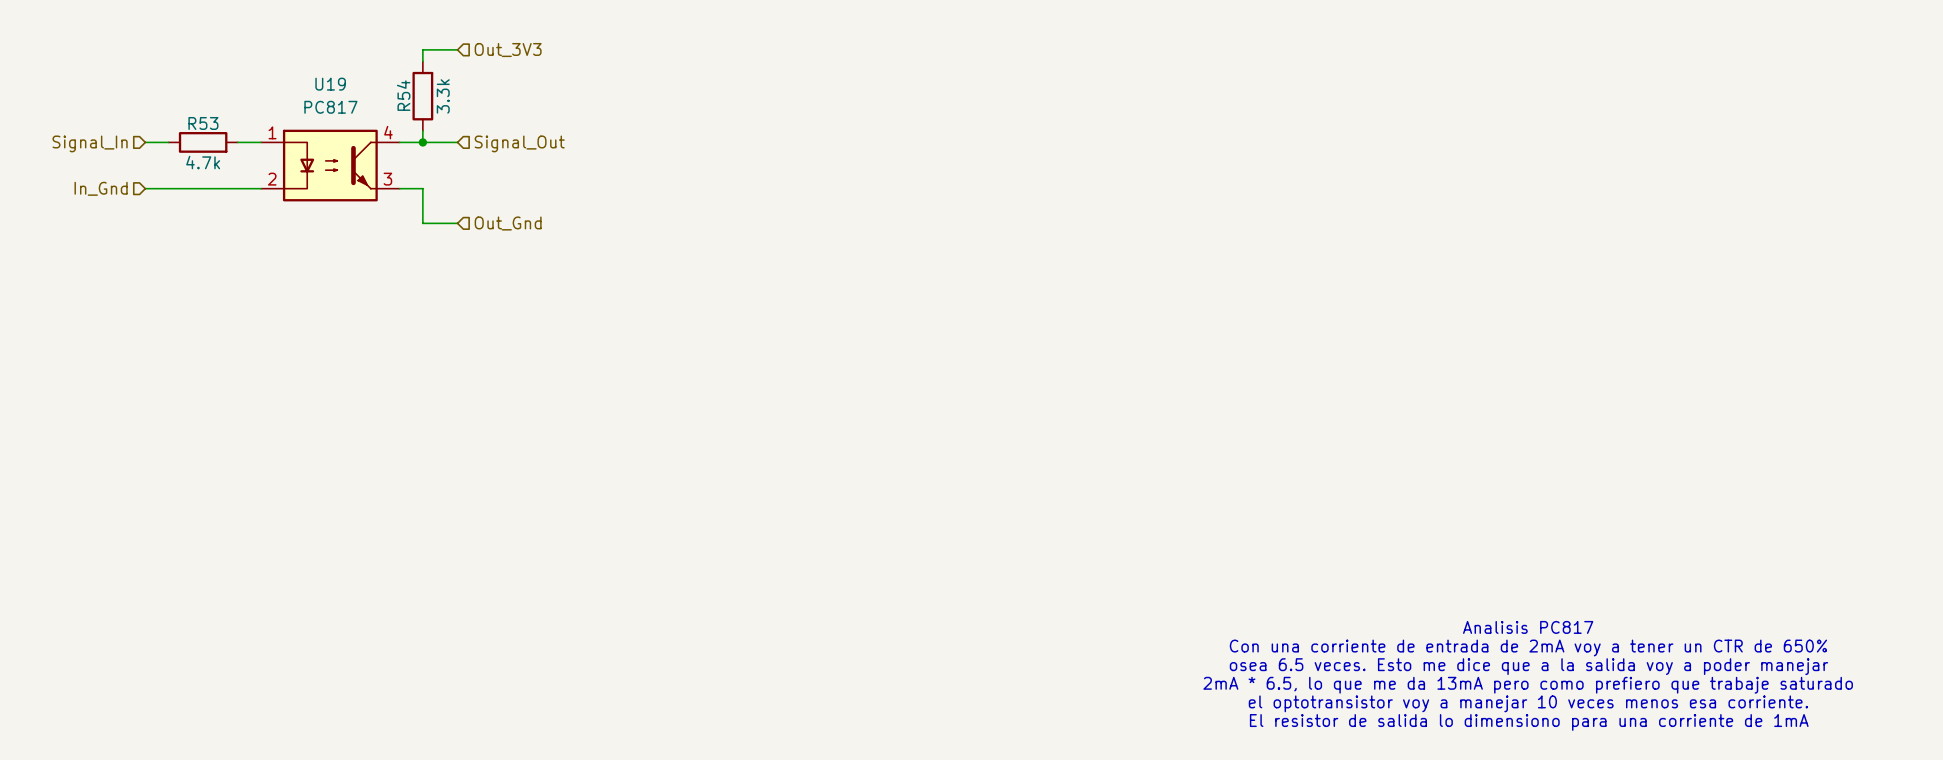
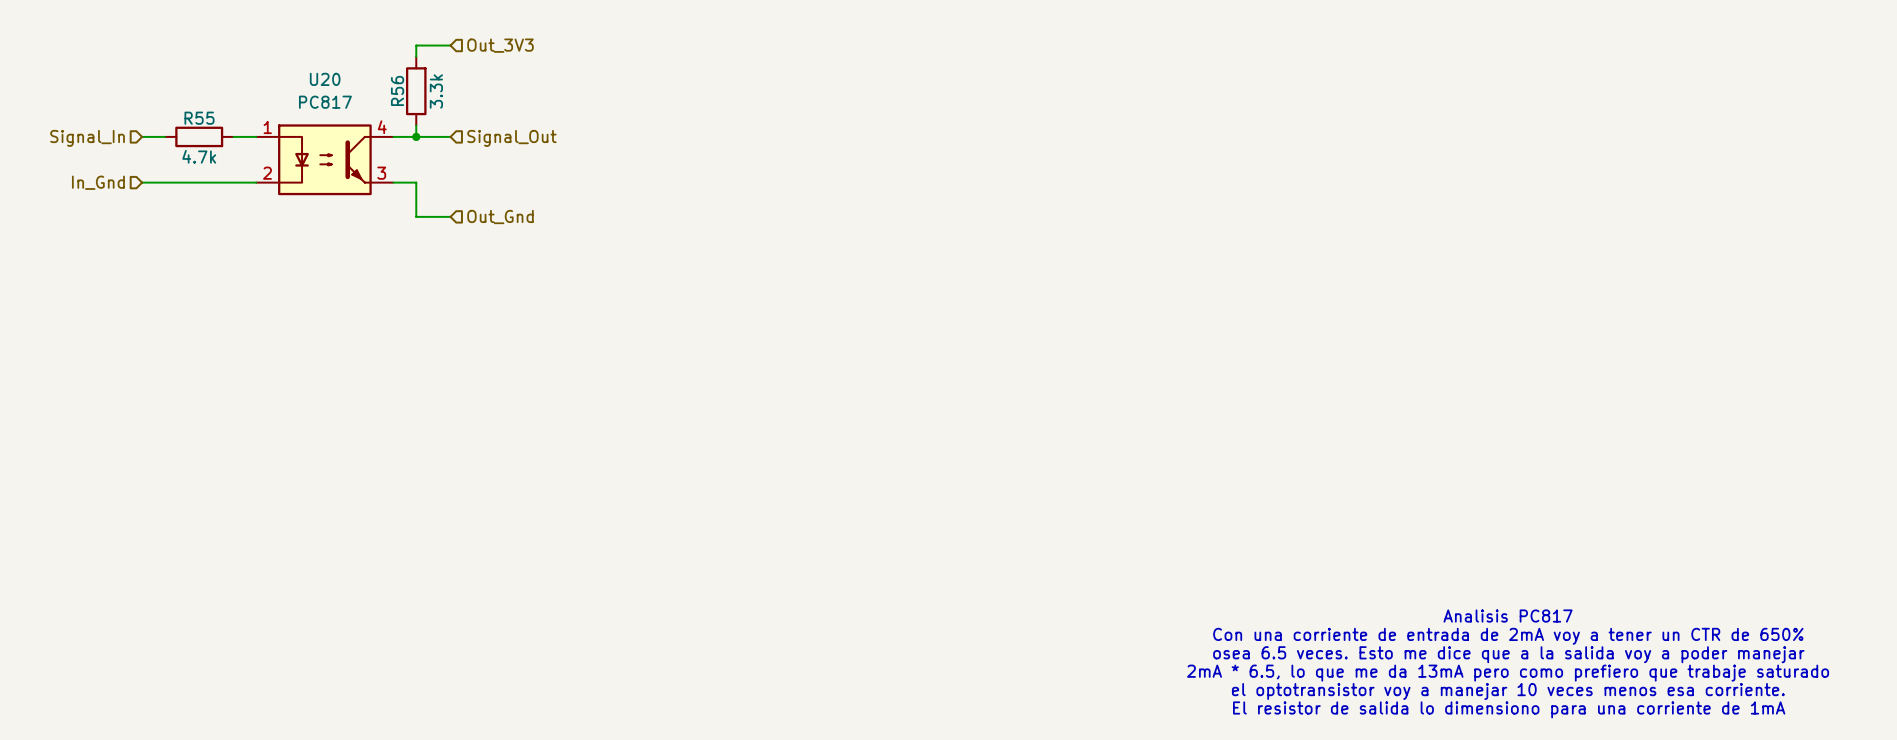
U19 name: U19 (330, 84) -> U20 (325, 79)
R54 name: R54 (403, 95) -> R56 (397, 90)
R53 name: R53 (203, 123) -> R55 (199, 118)

